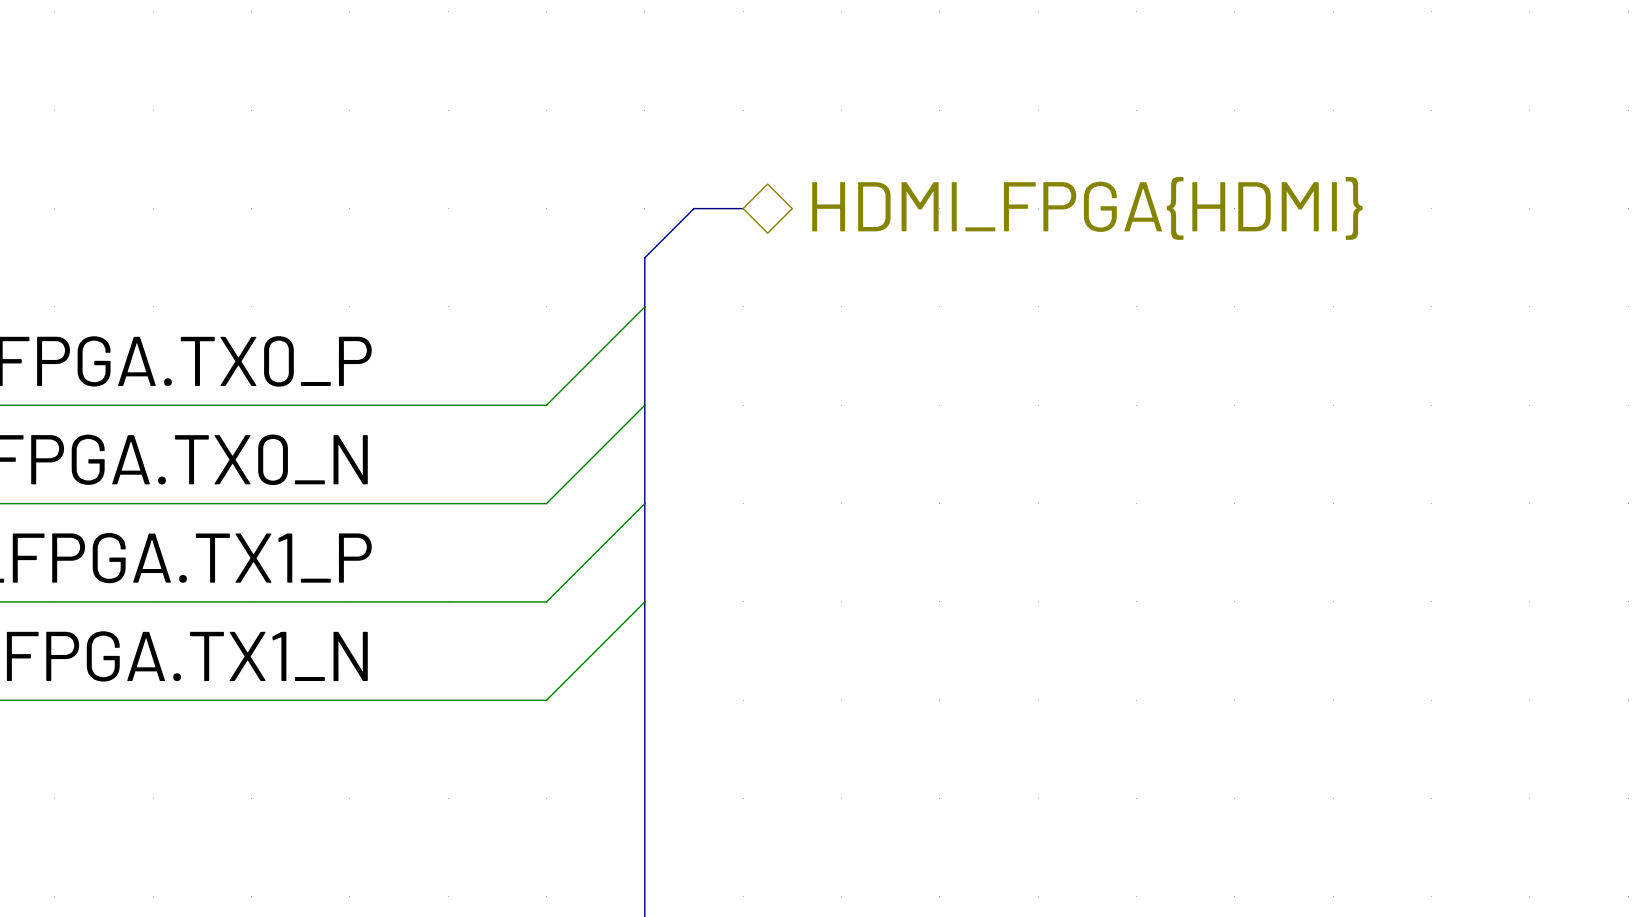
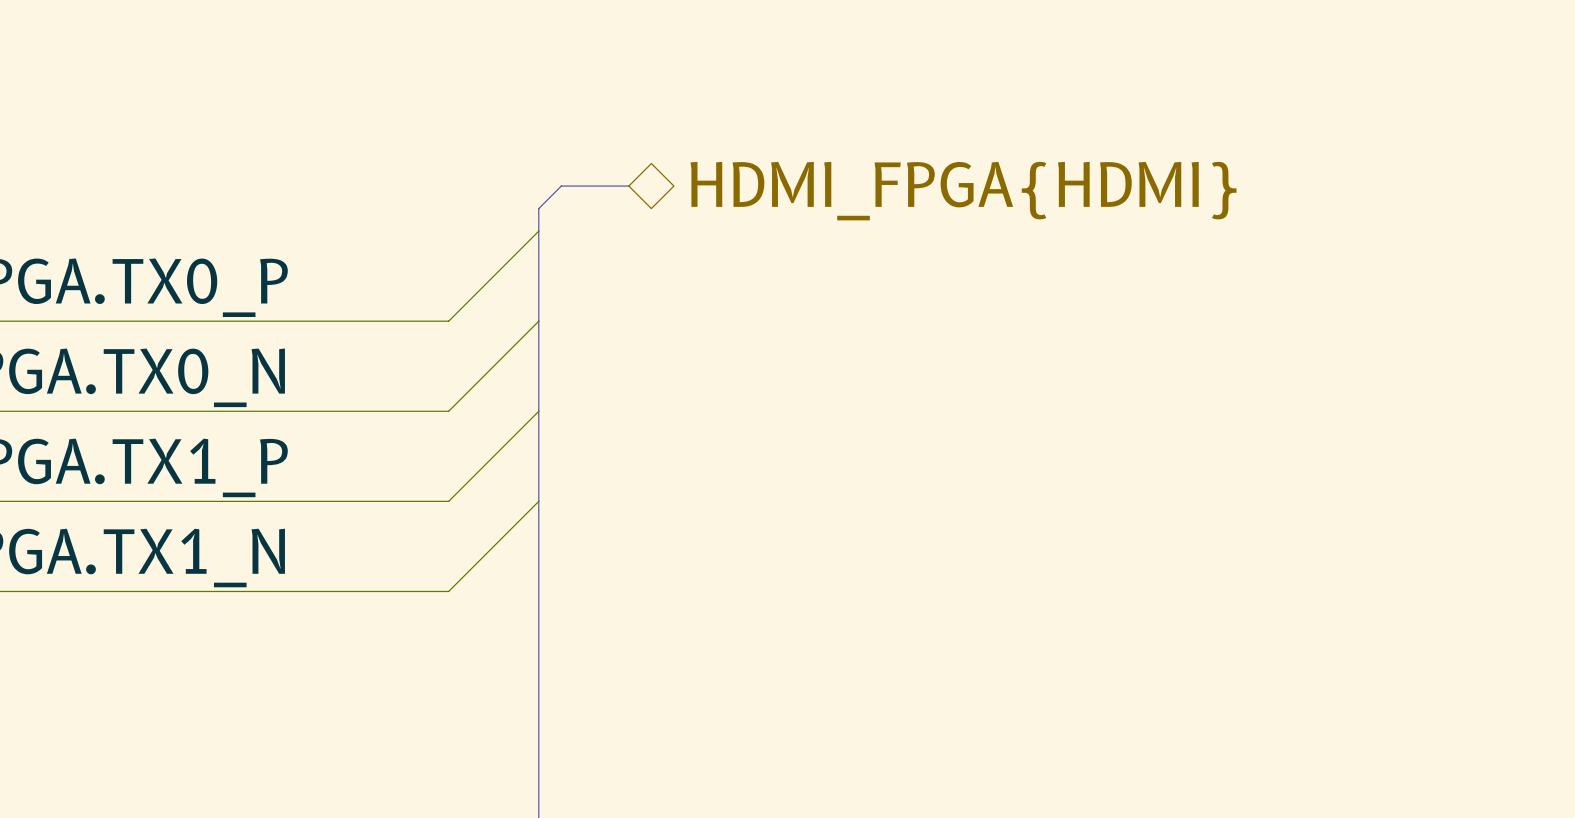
bus: (743, 208) (693, 208) (644, 257) (644, 282) -> (628, 186) (561, 186) (538, 208)
hierarchical label position: HDMI_FPGA{HDMI} (1087, 208) -> HDMI_FPGA{HDMI} (963, 191)

